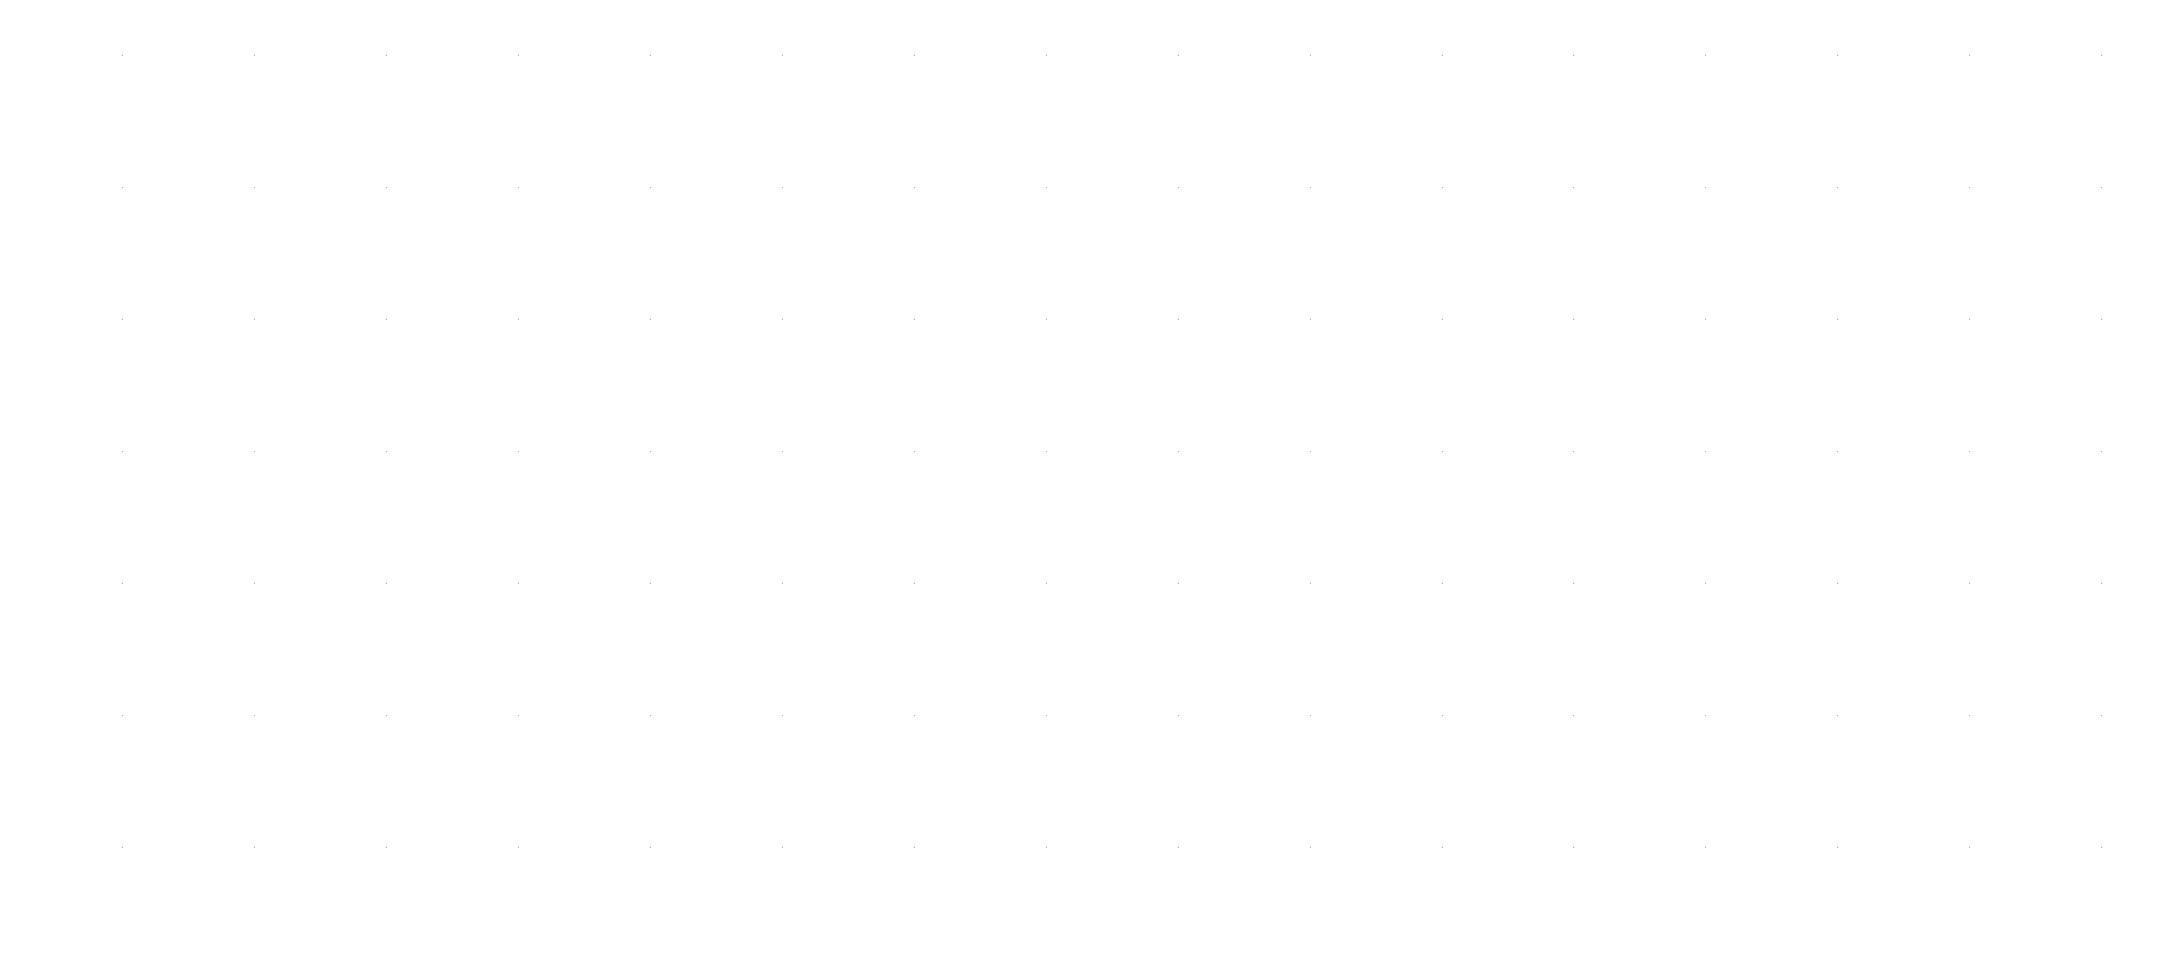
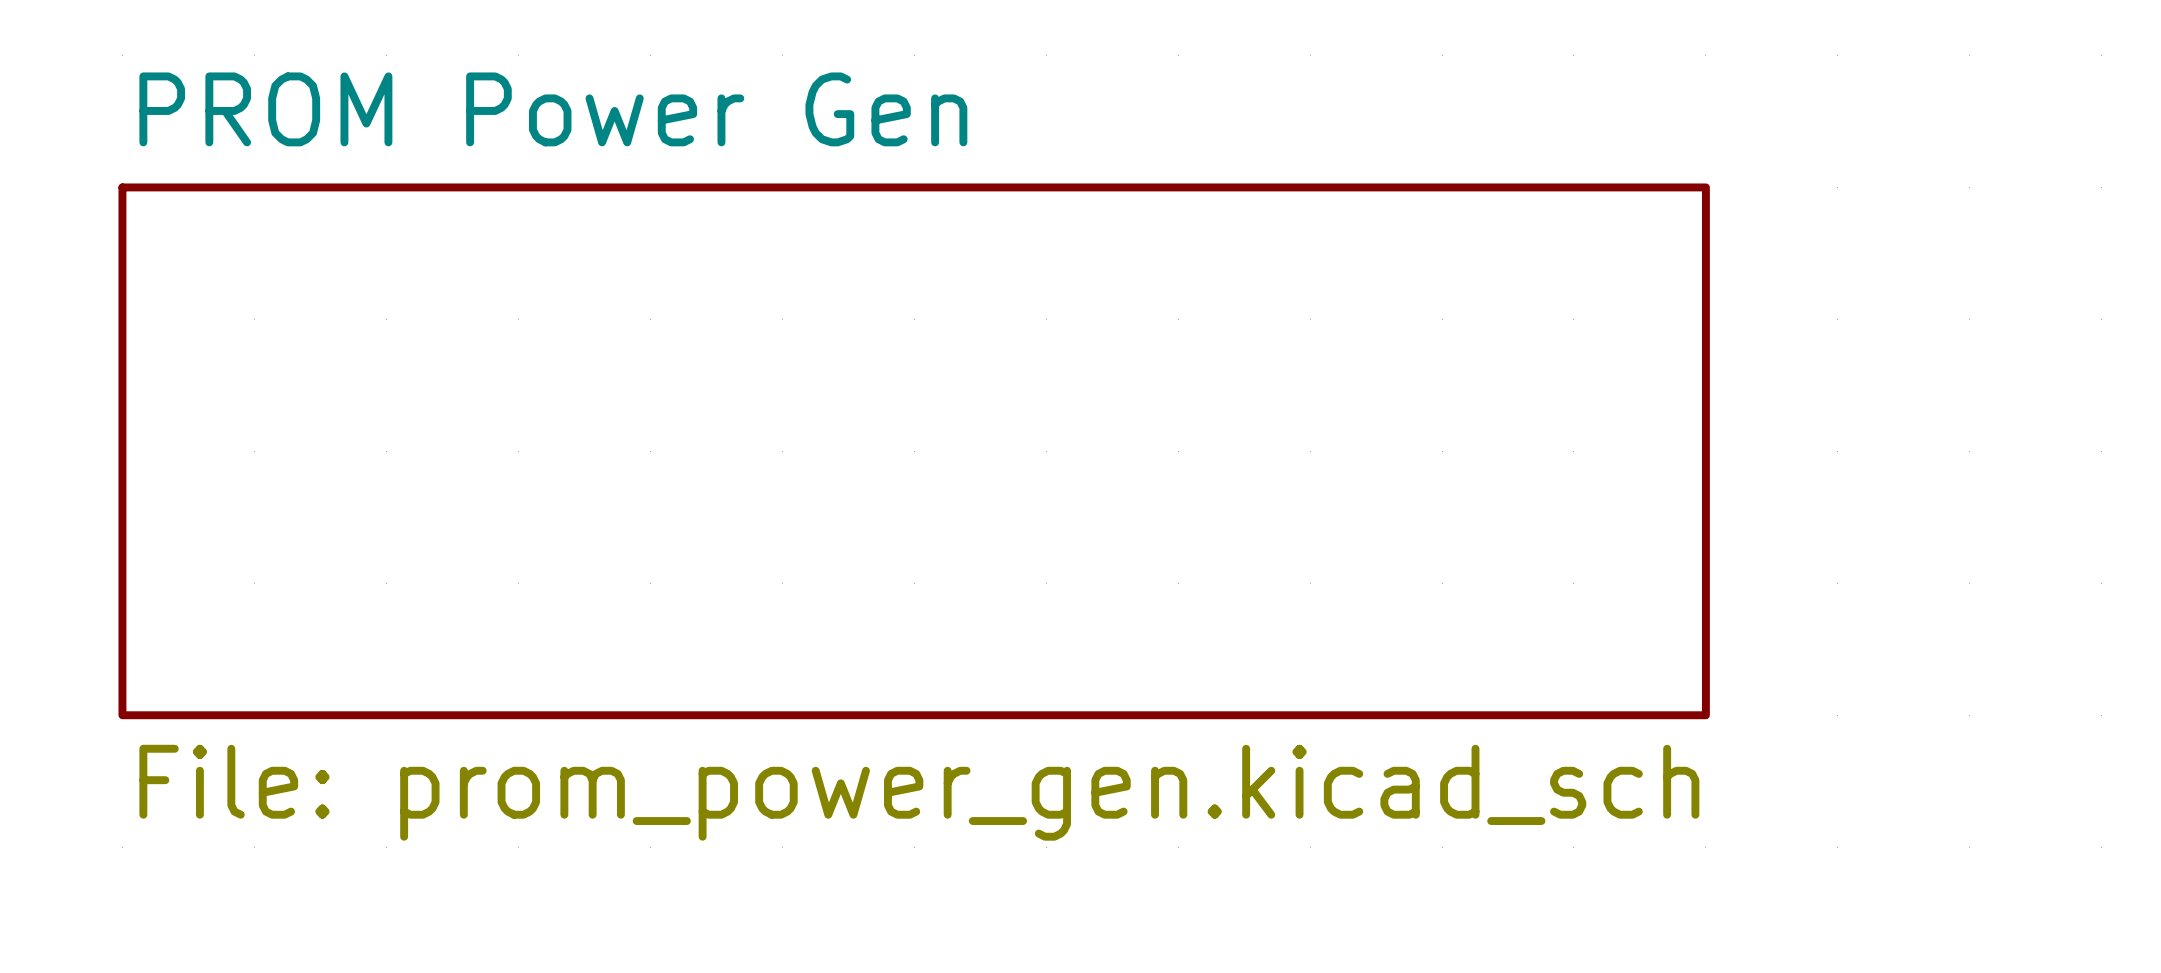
sheet PROM Power Gen: none -> File: prom_power_gen.kicad_sch (914, 451)

